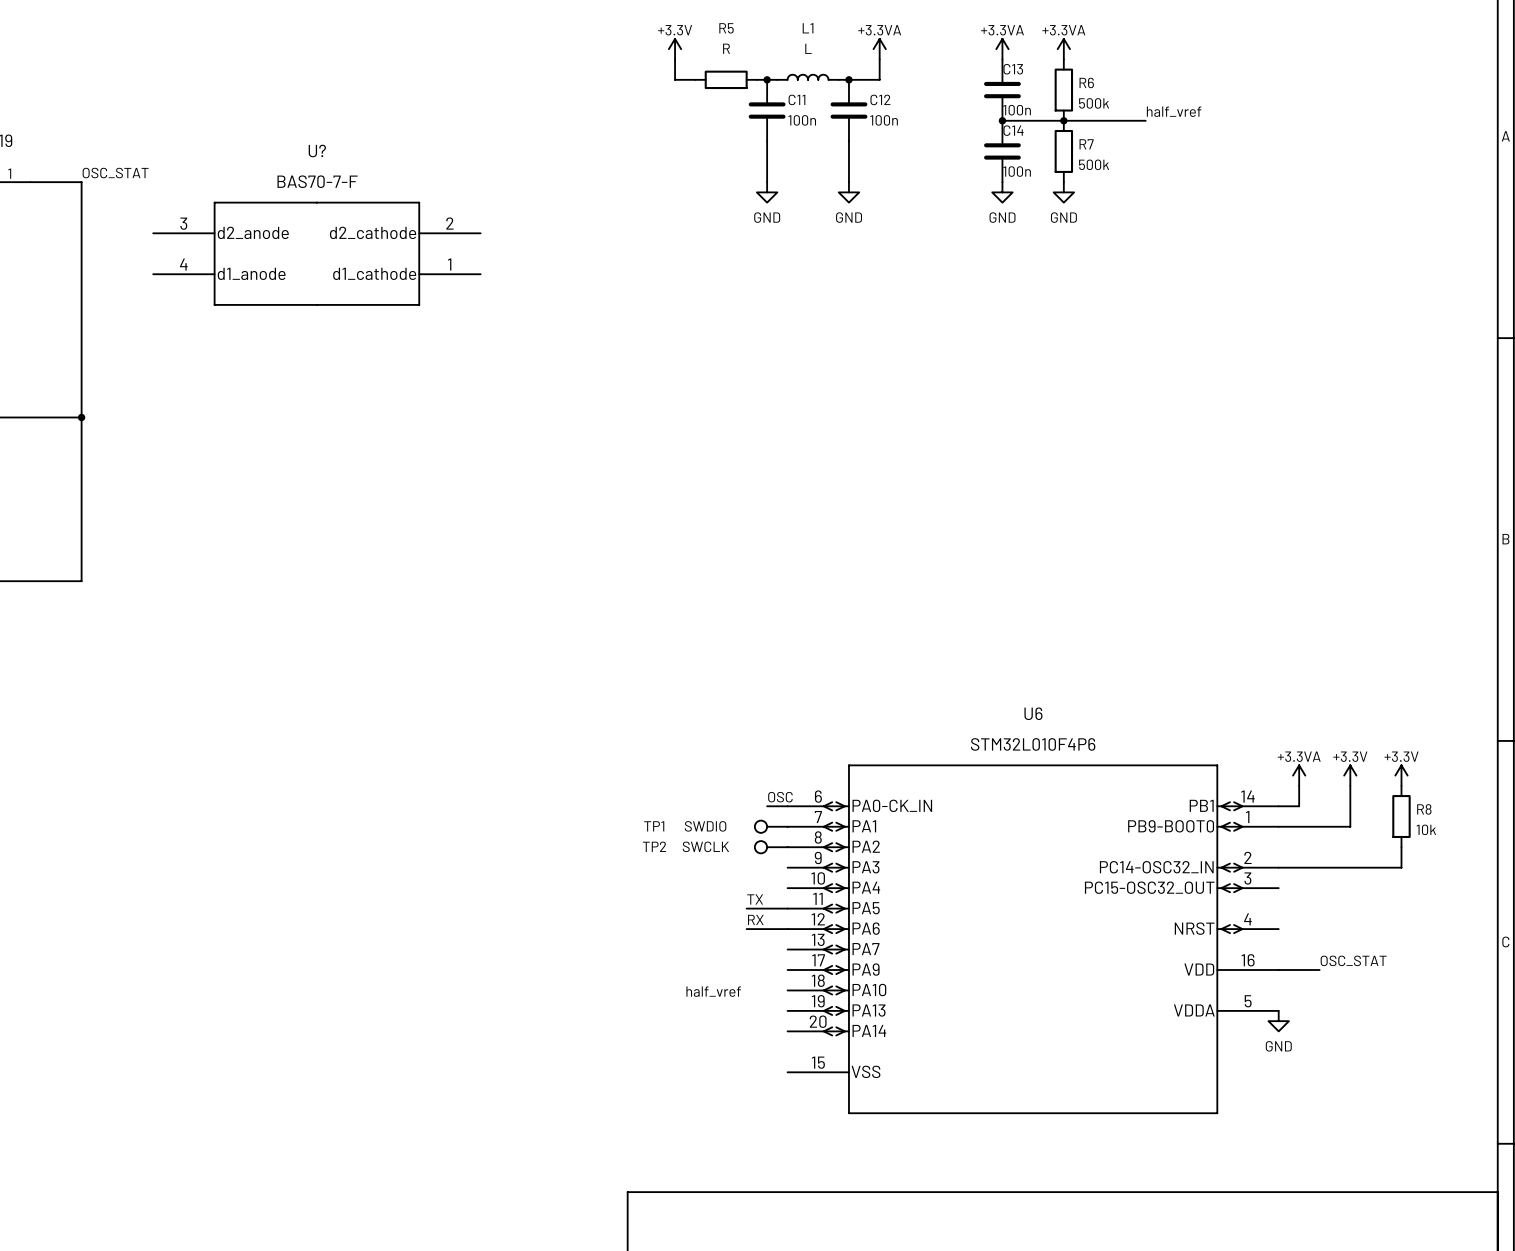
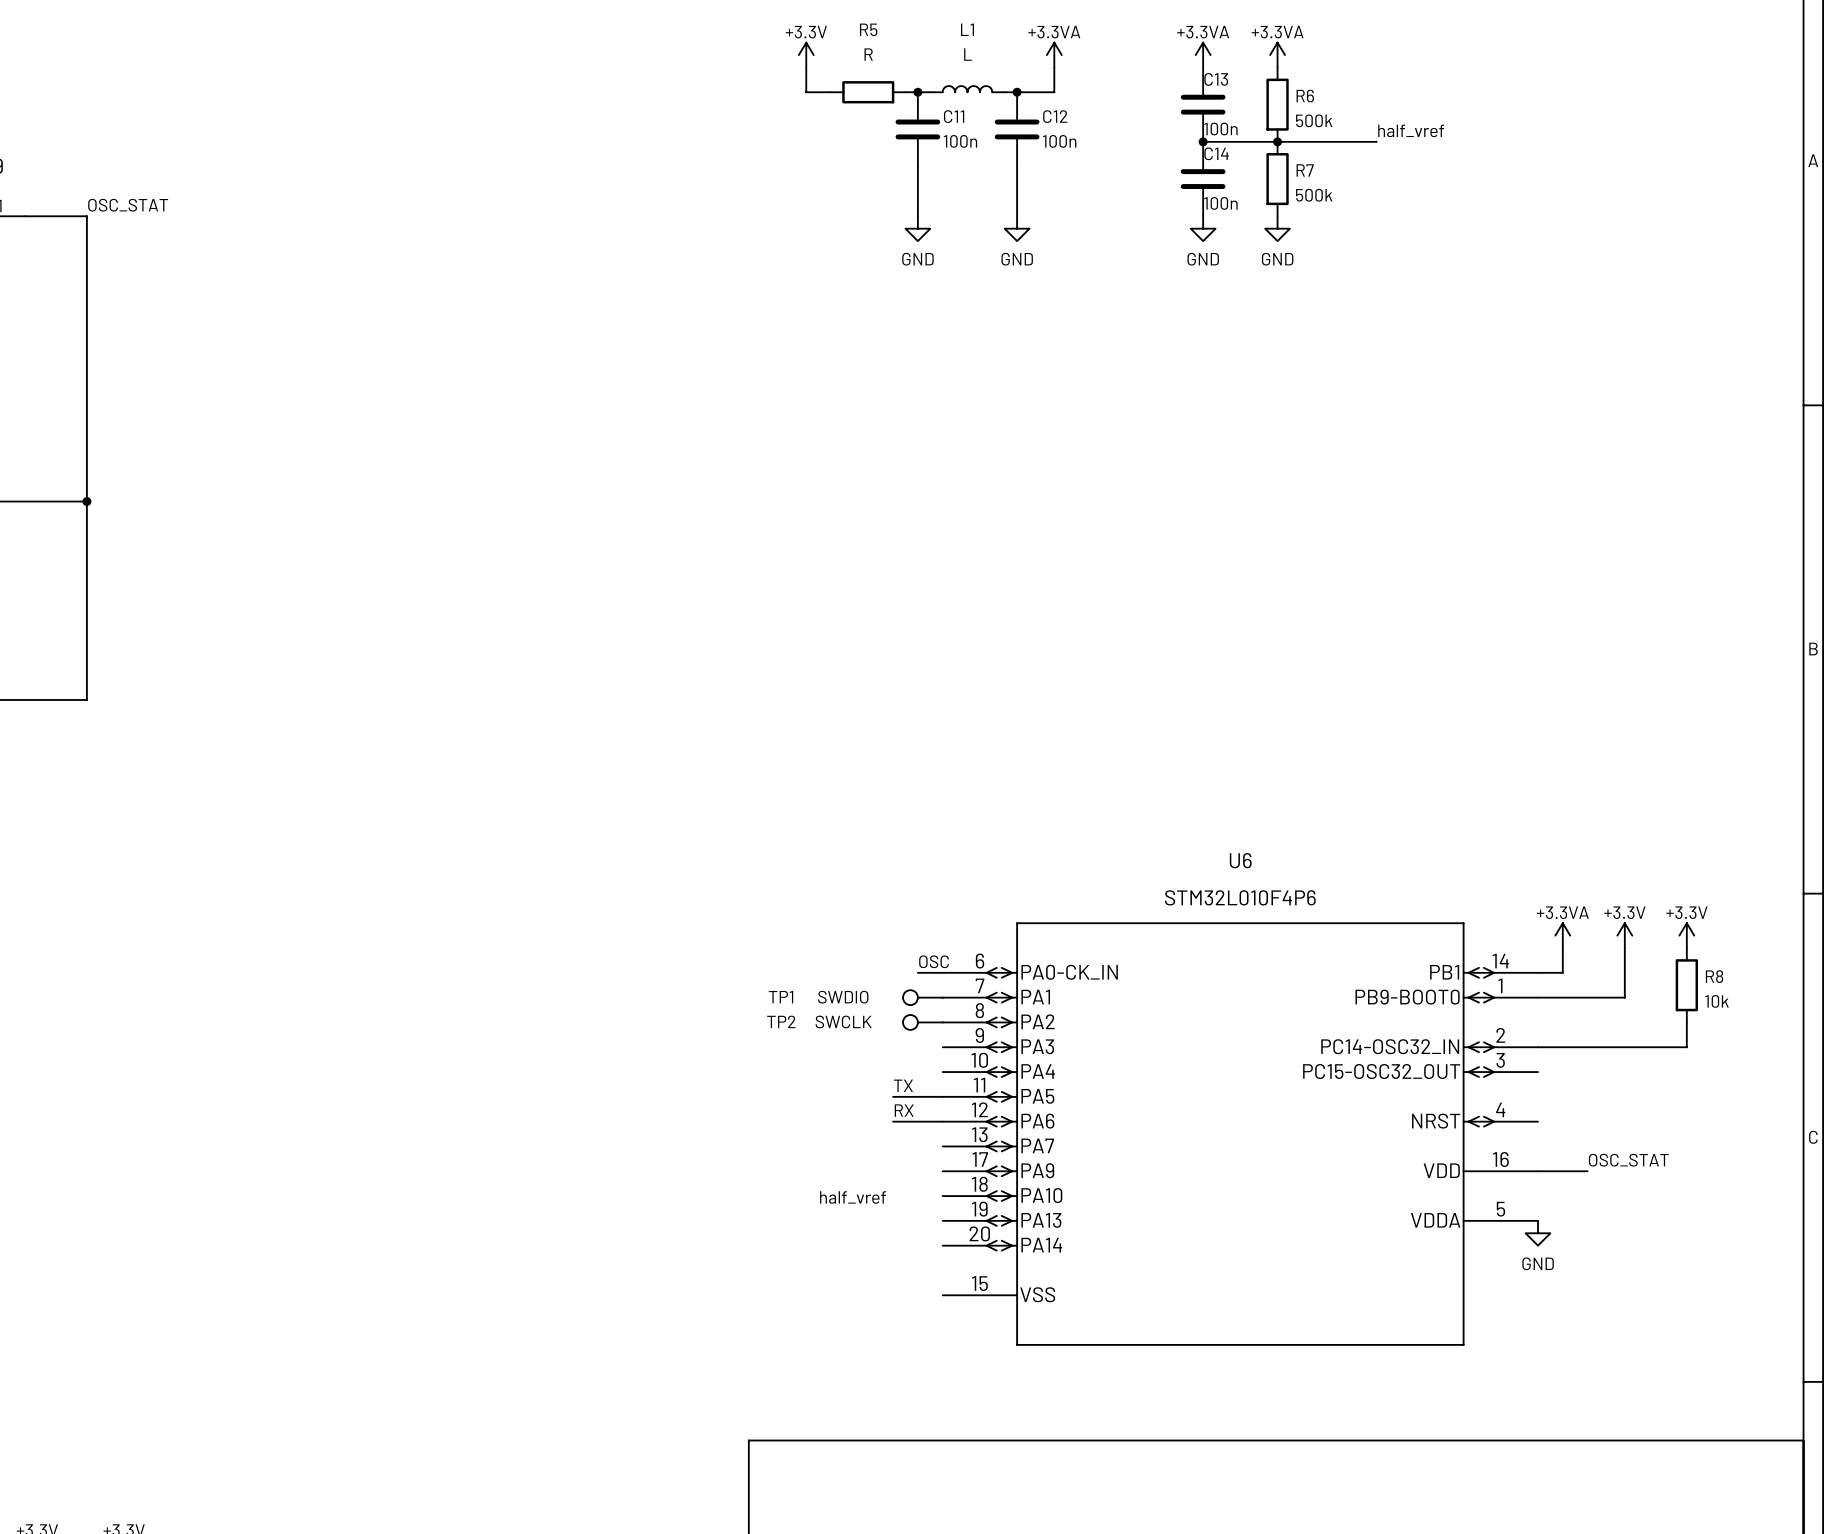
U?: BAS70-7-F (316, 253) -> none

